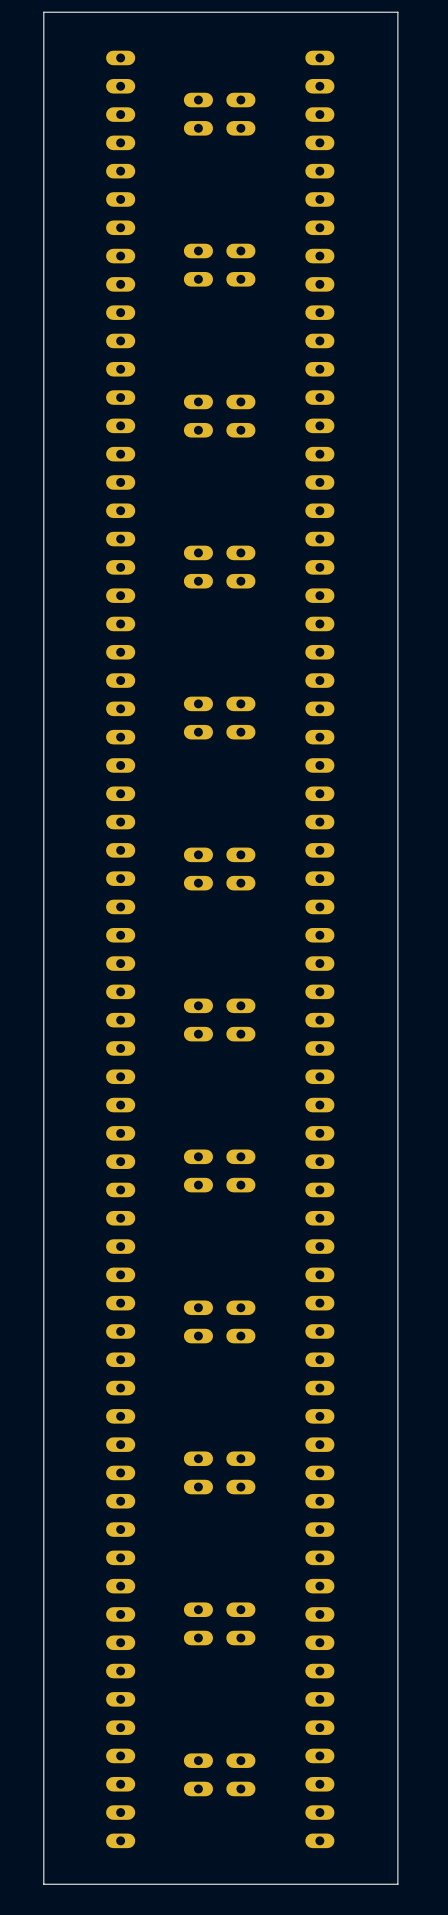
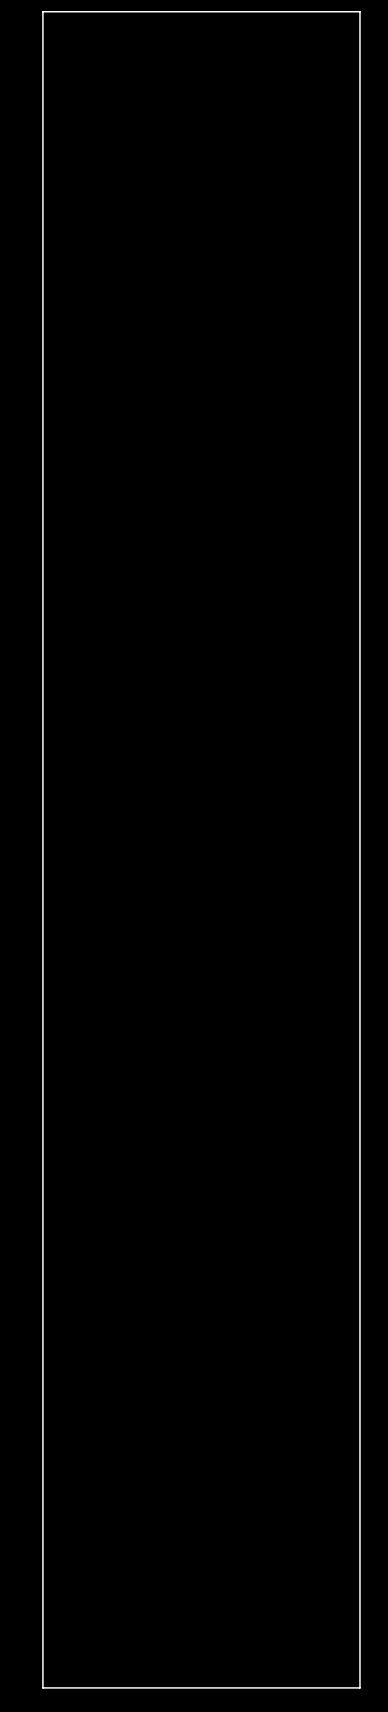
part: (120, 57) -> none
part: (319, 57) -> none
part: (120, 86) -> none
part: (319, 86) -> none
part: (198, 100) -> none
part: (240, 100) -> none
part: (120, 114) -> none
part: (319, 114) -> none
part: (198, 128) -> none
part: (240, 128) -> none
part: (120, 142) -> none
part: (319, 142) -> none
part: (120, 171) -> none
part: (319, 171) -> none
part: (120, 199) -> none
part: (319, 199) -> none
part: (120, 227) -> none
part: (319, 227) -> none
part: (198, 250) -> none
part: (240, 250) -> none
part: (120, 256) -> none
part: (319, 256) -> none
part: (198, 279) -> none
part: (240, 279) -> none
part: (120, 284) -> none
part: (319, 284) -> none
part: (120, 312) -> none
part: (319, 312) -> none
part: (120, 340) -> none
part: (319, 340) -> none
part: (120, 369) -> none
part: (319, 369) -> none
part: (120, 397) -> none
part: (319, 397) -> none
part: (198, 401) -> none
part: (240, 401) -> none
part: (120, 425) -> none
part: (319, 425) -> none
part: (198, 430) -> none
part: (240, 430) -> none
part: (120, 454) -> none
part: (319, 454) -> none
part: (120, 482) -> none
part: (319, 482) -> none
part: (120, 510) -> none
part: (319, 510) -> none
part: (120, 539) -> none
part: (319, 539) -> none
part: (198, 552) -> none
part: (240, 552) -> none
part: (120, 567) -> none
part: (319, 567) -> none
part: (198, 581) -> none
part: (240, 581) -> none
part: (120, 595) -> none
part: (319, 595) -> none
part: (120, 623) -> none
part: (319, 623) -> none
part: (120, 652) -> none
part: (319, 652) -> none
part: (120, 680) -> none
part: (319, 680) -> none
part: (198, 703) -> none
part: (240, 703) -> none
part: (120, 708) -> none
part: (319, 708) -> none
part: (198, 732) -> none
part: (240, 732) -> none
part: (120, 737) -> none
part: (319, 737) -> none
part: (120, 765) -> none
part: (319, 765) -> none
part: (120, 793) -> none
part: (319, 793) -> none
part: (120, 822) -> none
part: (319, 822) -> none
part: (120, 850) -> none
part: (319, 850) -> none
part: (198, 854) -> none
part: (240, 854) -> none
part: (120, 878) -> none
part: (319, 878) -> none
part: (198, 883) -> none
part: (240, 883) -> none
part: (120, 906) -> none
part: (319, 906) -> none
part: (120, 935) -> none
part: (319, 935) -> none
part: (120, 963) -> none
part: (319, 963) -> none
part: (120, 991) -> none
part: (319, 991) -> none
part: (198, 1005) -> none
part: (240, 1005) -> none
part: (120, 1020) -> none
part: (319, 1020) -> none
part: (198, 1034) -> none
part: (240, 1034) -> none
part: (120, 1048) -> none
part: (319, 1048) -> none
part: (120, 1076) -> none
part: (319, 1076) -> none
part: (120, 1105) -> none
part: (319, 1105) -> none
part: (120, 1133) -> none
part: (319, 1133) -> none
part: (198, 1156) -> none
part: (240, 1156) -> none
part: (120, 1161) -> none
part: (319, 1161) -> none
part: (198, 1185) -> none
part: (240, 1185) -> none
part: (120, 1189) -> none
part: (319, 1189) -> none
part: (120, 1218) -> none
part: (319, 1218) -> none
part: (120, 1246) -> none
part: (319, 1246) -> none
part: (120, 1274) -> none
part: (319, 1274) -> none
part: (120, 1303) -> none
part: (319, 1303) -> none
part: (198, 1307) -> none
part: (240, 1307) -> none
part: (120, 1331) -> none
part: (319, 1331) -> none
part: (198, 1336) -> none
part: (240, 1336) -> none
part: (120, 1359) -> none
part: (319, 1359) -> none
part: (120, 1388) -> none
part: (319, 1388) -> none
part: (120, 1416) -> none
part: (319, 1416) -> none
part: (120, 1444) -> none
part: (319, 1444) -> none
part: (198, 1458) -> none
part: (240, 1458) -> none
part: (120, 1472) -> none
part: (319, 1472) -> none
part: (198, 1487) -> none
part: (240, 1487) -> none
part: (120, 1501) -> none
part: (319, 1501) -> none
part: (120, 1529) -> none
part: (319, 1529) -> none
part: (120, 1557) -> none
part: (319, 1557) -> none
part: (120, 1586) -> none
part: (319, 1586) -> none
part: (198, 1609) -> none
part: (240, 1609) -> none
part: (120, 1614) -> none
part: (319, 1614) -> none
part: (198, 1638) -> none
part: (240, 1638) -> none
part: (120, 1642) -> none
part: (319, 1642) -> none
part: (120, 1671) -> none
part: (319, 1671) -> none
part: (120, 1699) -> none
part: (319, 1699) -> none
part: (120, 1727) -> none
part: (319, 1727) -> none
part: (120, 1755) -> none
part: (319, 1755) -> none
part: (198, 1760) -> none
part: (240, 1760) -> none
part: (120, 1784) -> none
part: (319, 1784) -> none
part: (198, 1788) -> none
part: (240, 1788) -> none
part: (120, 1812) -> none
part: (319, 1812) -> none
part: (120, 1840) -> none
part: (319, 1840) -> none

